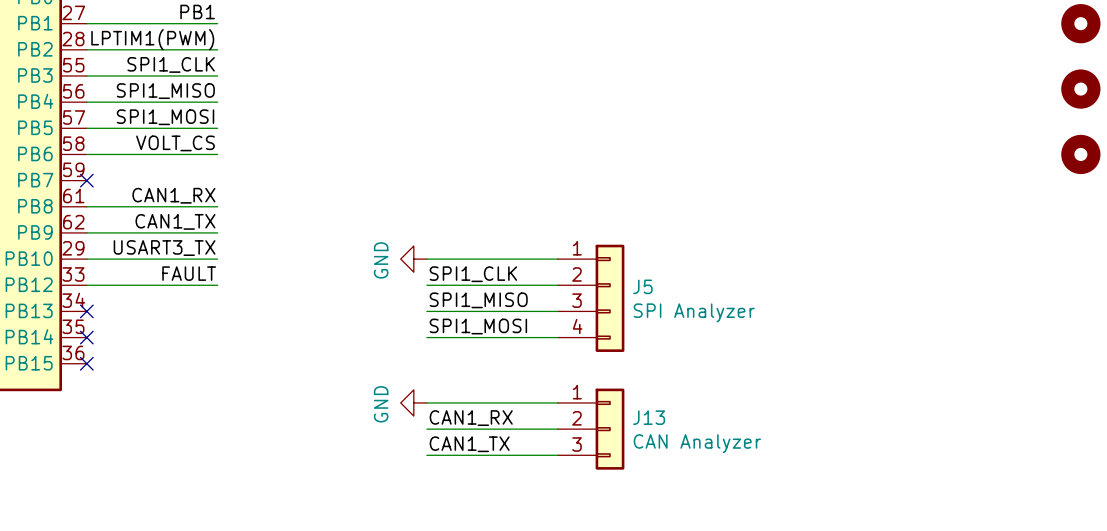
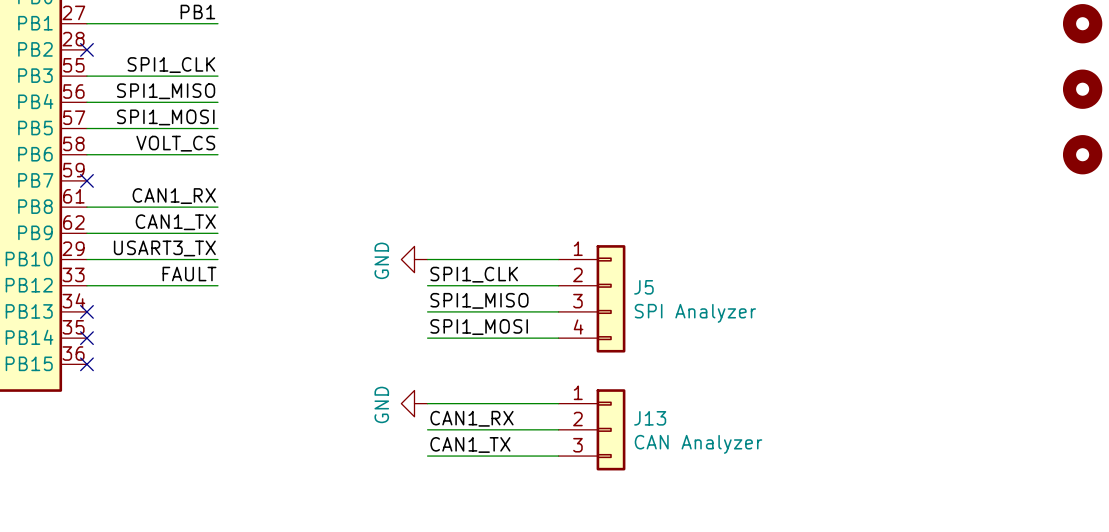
label: LPTIM1(PWM) (152, 39) -> none
wire: (86, 49) (217, 49) -> none
no-connect mark: none -> (86, 49)

